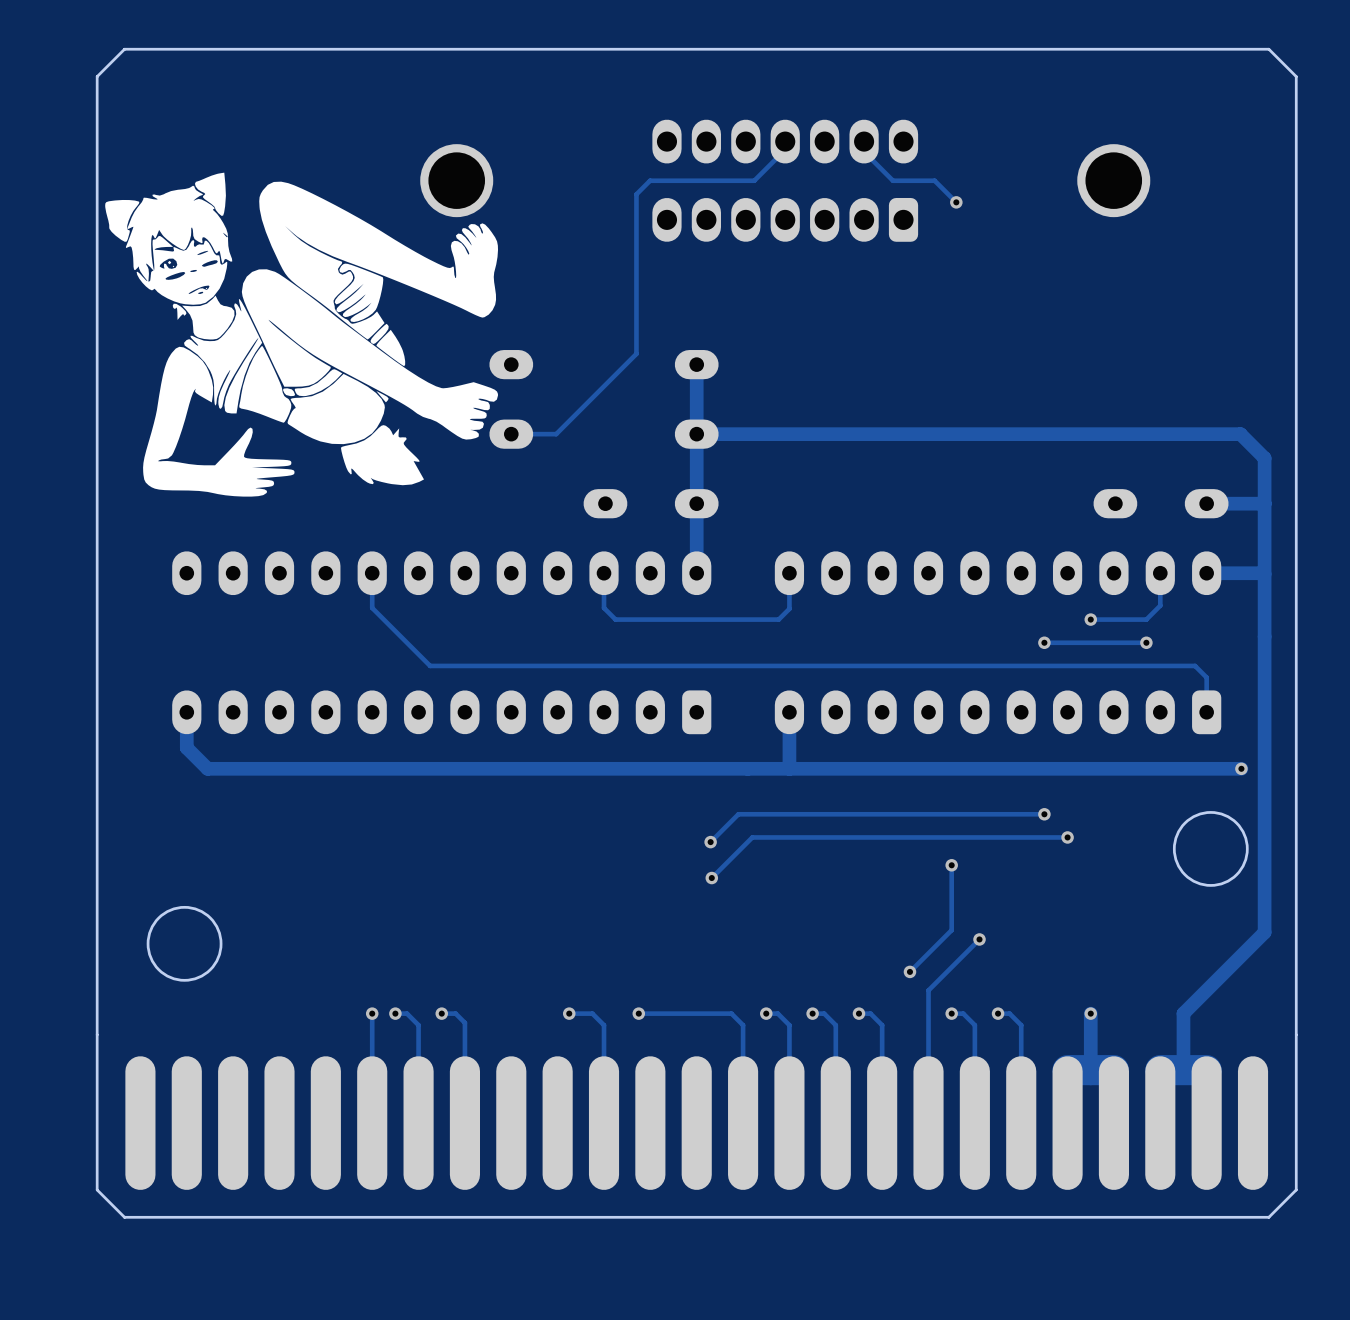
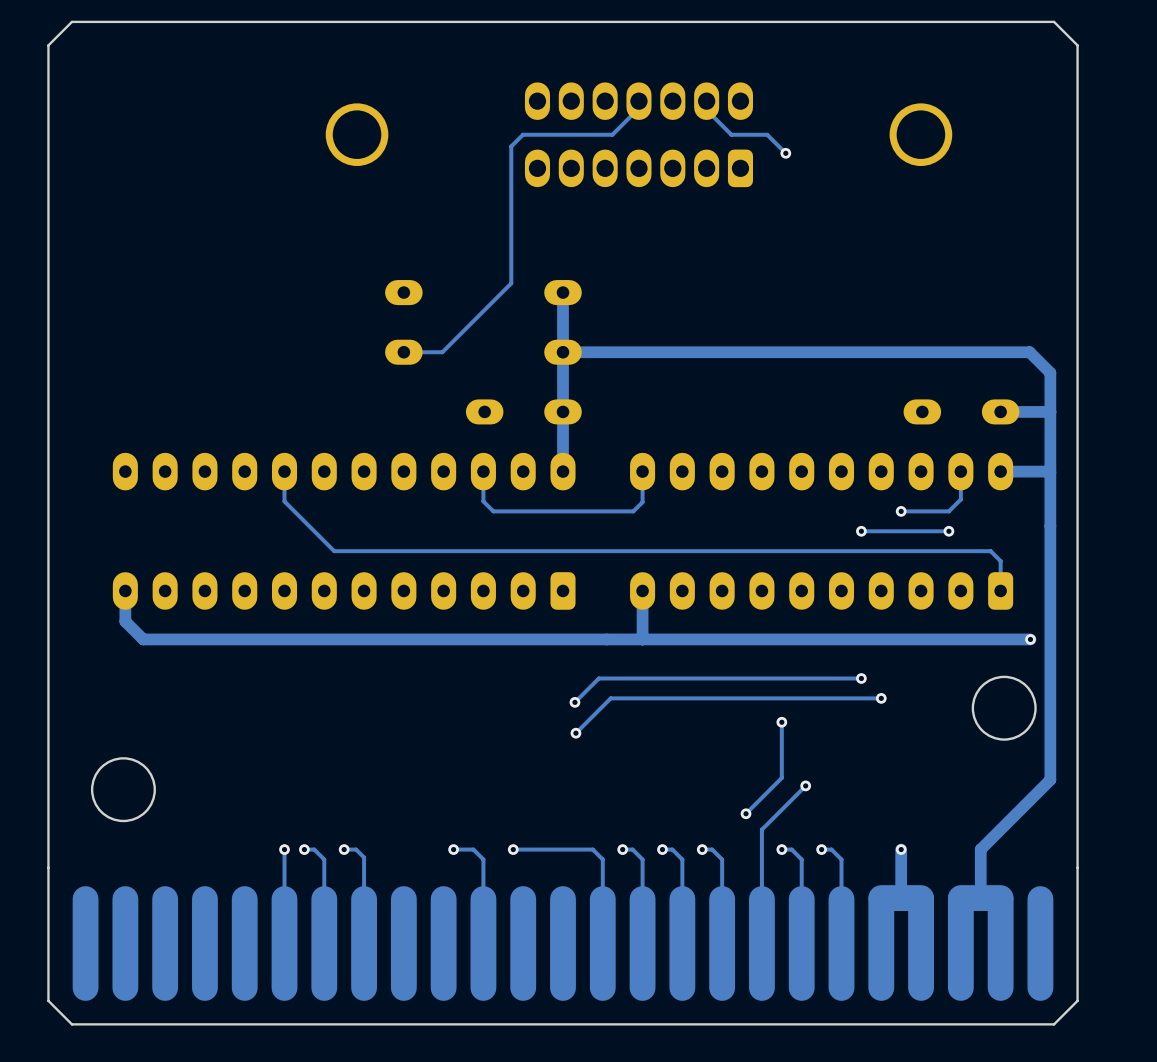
drawing: [105, 172, 499, 497] -> none

